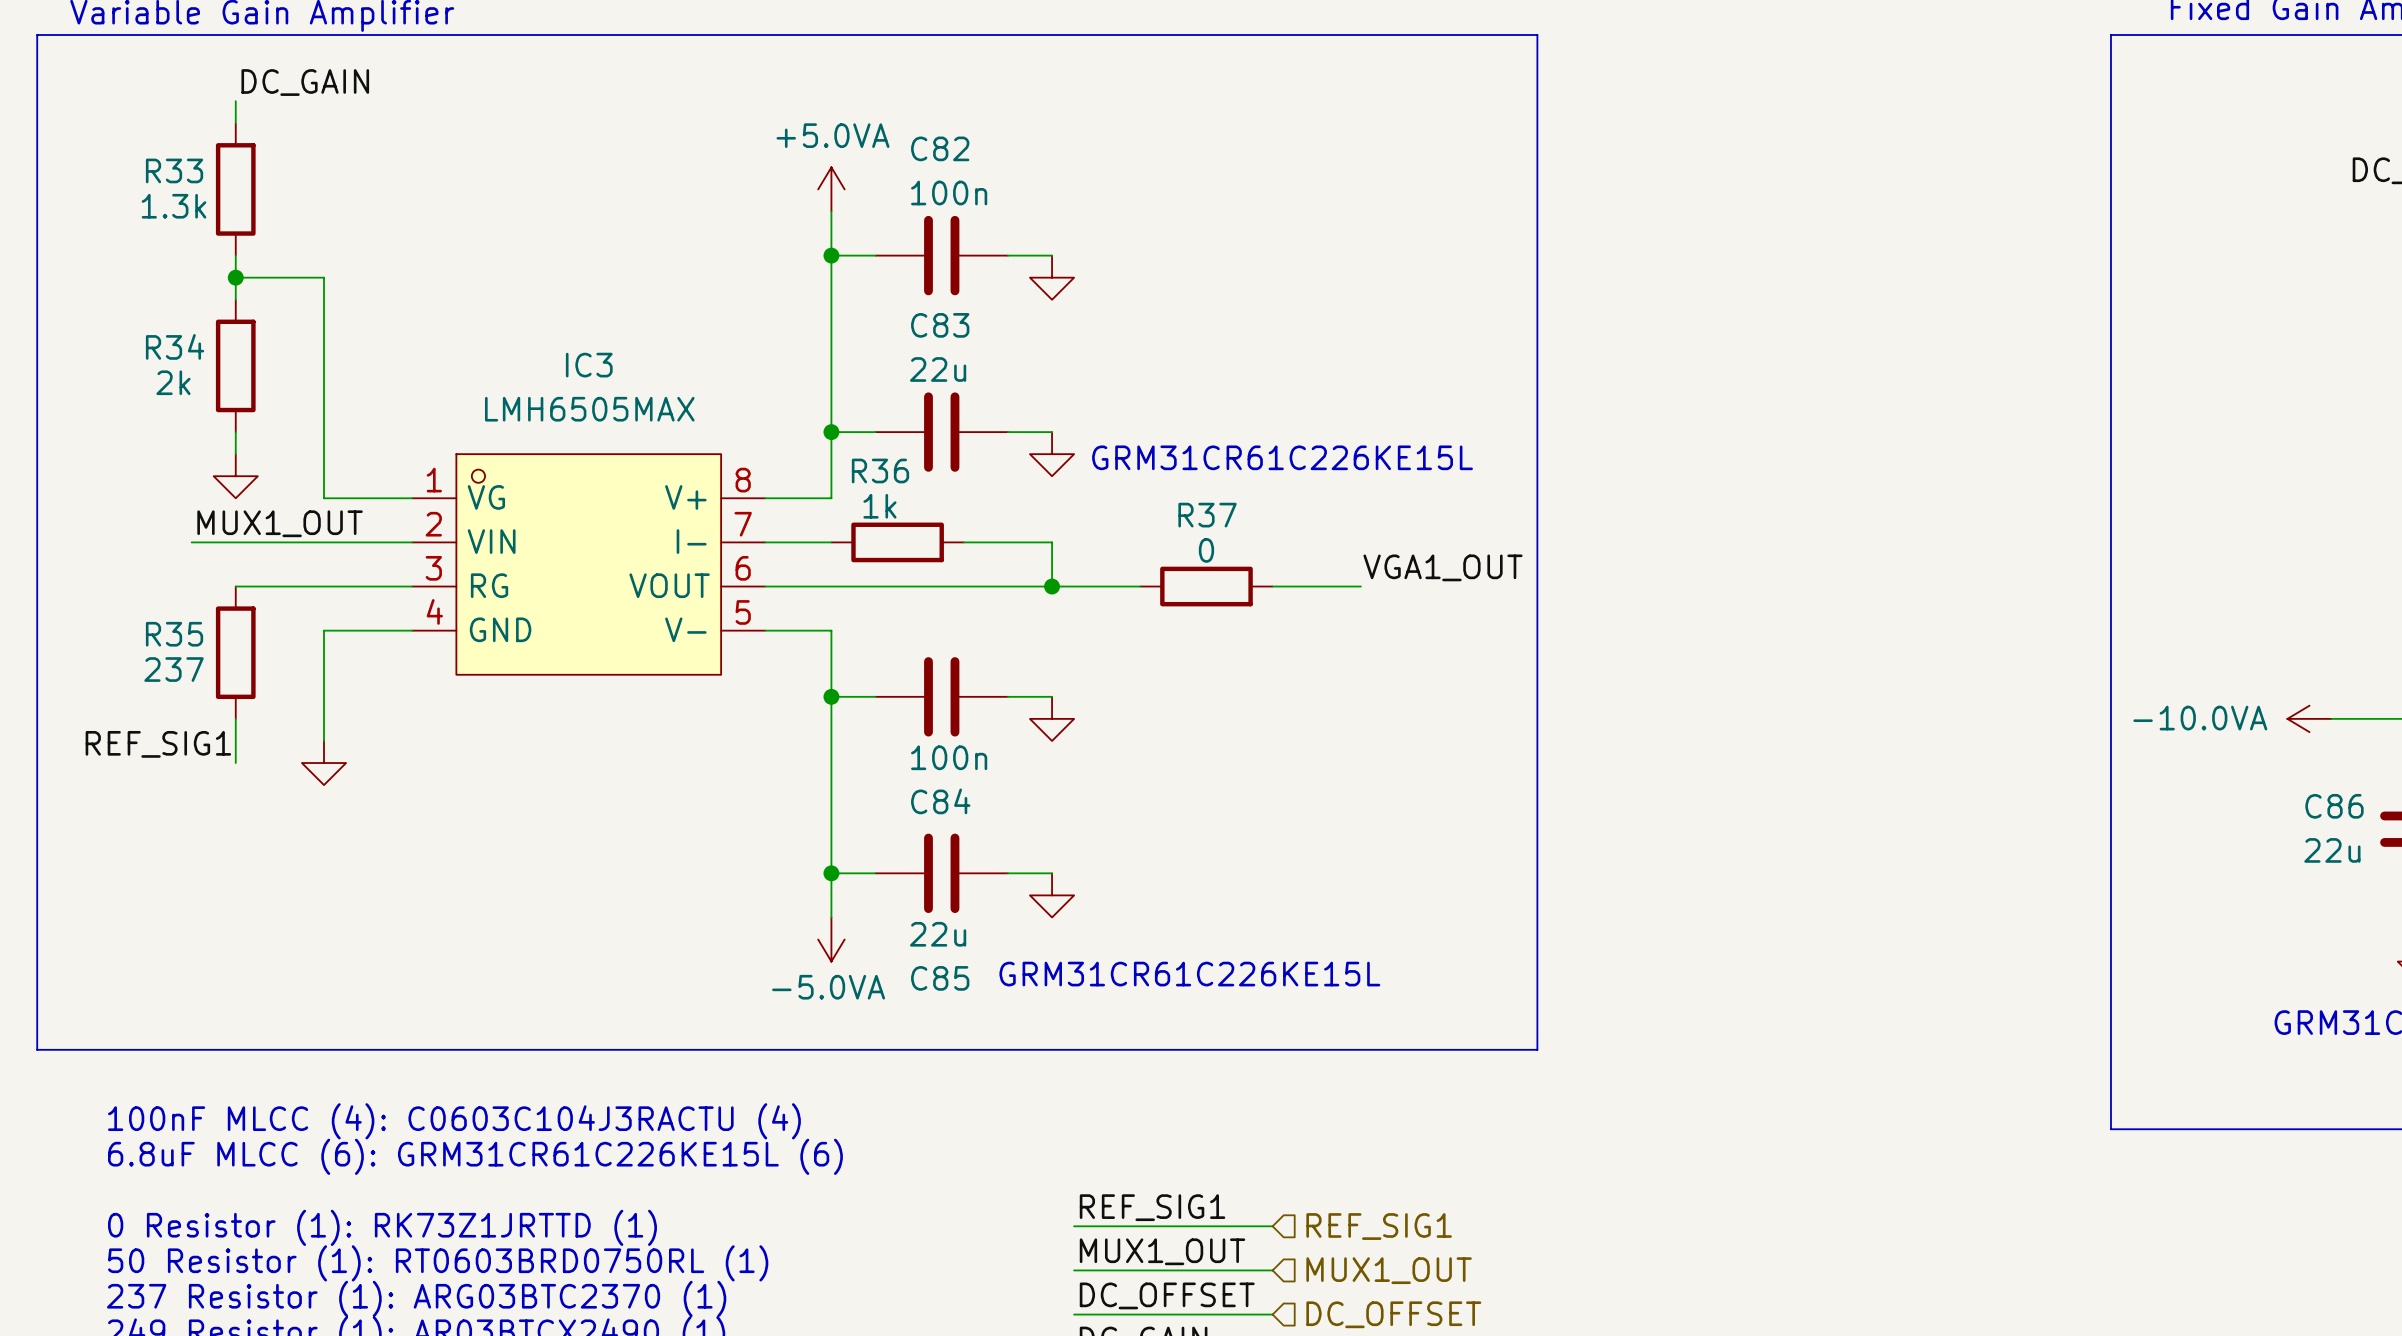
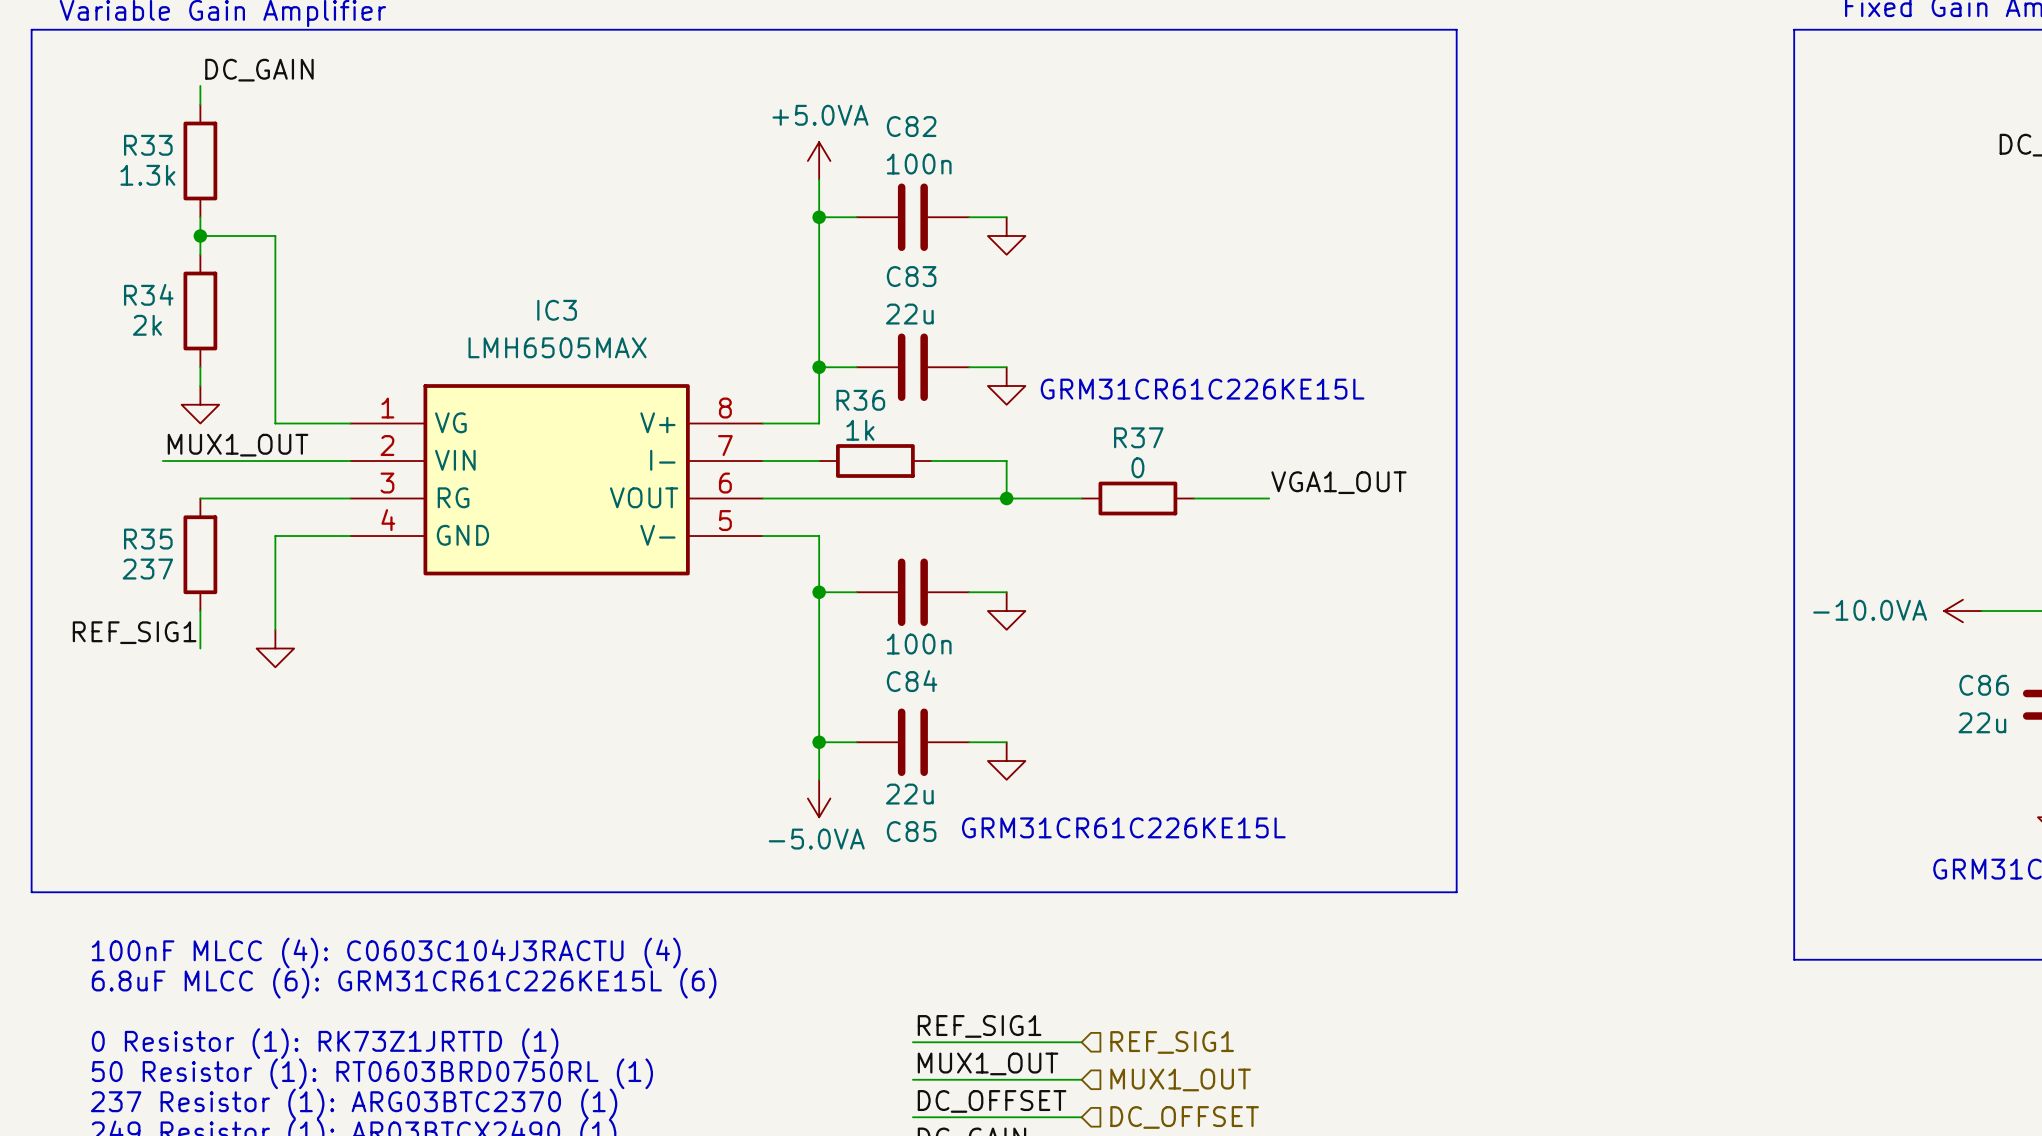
line: (1537, 34) (1537, 1049) -> (1306, 29) (1456, 29) (1456, 892) (1306, 892)
power symbol position: +5.0VA (831, 189) -> +5.0VA (819, 160)
wire: (831, 211) (831, 498) (765, 498) -> (819, 179) (819, 423) (762, 423)
wire: (831, 255) (875, 255) -> (969, 217) (1006, 217)
junction: (831, 255) -> none
C82 position: (941, 255) -> (912, 217)
junction: none -> (819, 217)
power symbol: (1052, 277) -> none
power symbol: none -> (1006, 235)
wire: (831, 432) (875, 432) -> (969, 367) (1006, 367)
junction: (831, 432) -> none
C83 position: (941, 432) -> (912, 367)
junction: none -> (819, 367)
IC3 symbol: [412, 454, 766, 675] -> [350, 384, 763, 576]
power symbol: (1052, 454) -> none
power symbol: none -> (1006, 386)
text position: GRM31CR61C226KE15L (1282, 457) -> GRM31CR61C226KE15L (1202, 389)
R36 position: (897, 542) -> (875, 461)
wire: (963, 542) (1052, 542) (1052, 586) -> (819, 461) (762, 461)
wire: none -> (931, 461) (1006, 461) (1006, 498)
label position: VGA1_OUT (1443, 567) -> VGA1_OUT (1338, 482)
junction: (1052, 586) -> none
junction: none -> (1006, 498)
R37 position: (1206, 586) -> (1137, 498)
wire: (1272, 586) (1360, 586) -> (1081, 498) (969, 498)
wire: none -> (1194, 498) (1269, 498)
wire: (765, 630) (831, 630) (831, 917) -> (762, 536) (819, 536) (819, 779)
wire: (831, 696) (875, 696) -> (969, 592) (1006, 592)
junction: (831, 696) -> none
C84 position: (941, 696) -> (912, 592)
junction: none -> (819, 592)
power symbol: (1052, 718) -> none
power symbol: none -> (1006, 611)
wire: (831, 873) (875, 873) -> (969, 742) (1006, 742)
junction: (831, 873) -> none
C85 position: (941, 873) -> (912, 742)
junction: none -> (819, 742)
power symbol: (1052, 895) -> none
power symbol: none -> (1006, 761)
power symbol position: -5.0VA (831, 939) -> -5.0VA (819, 798)
text position: GRM31CR61C226KE15L (1189, 974) -> GRM31CR61C226KE15L (1123, 827)

